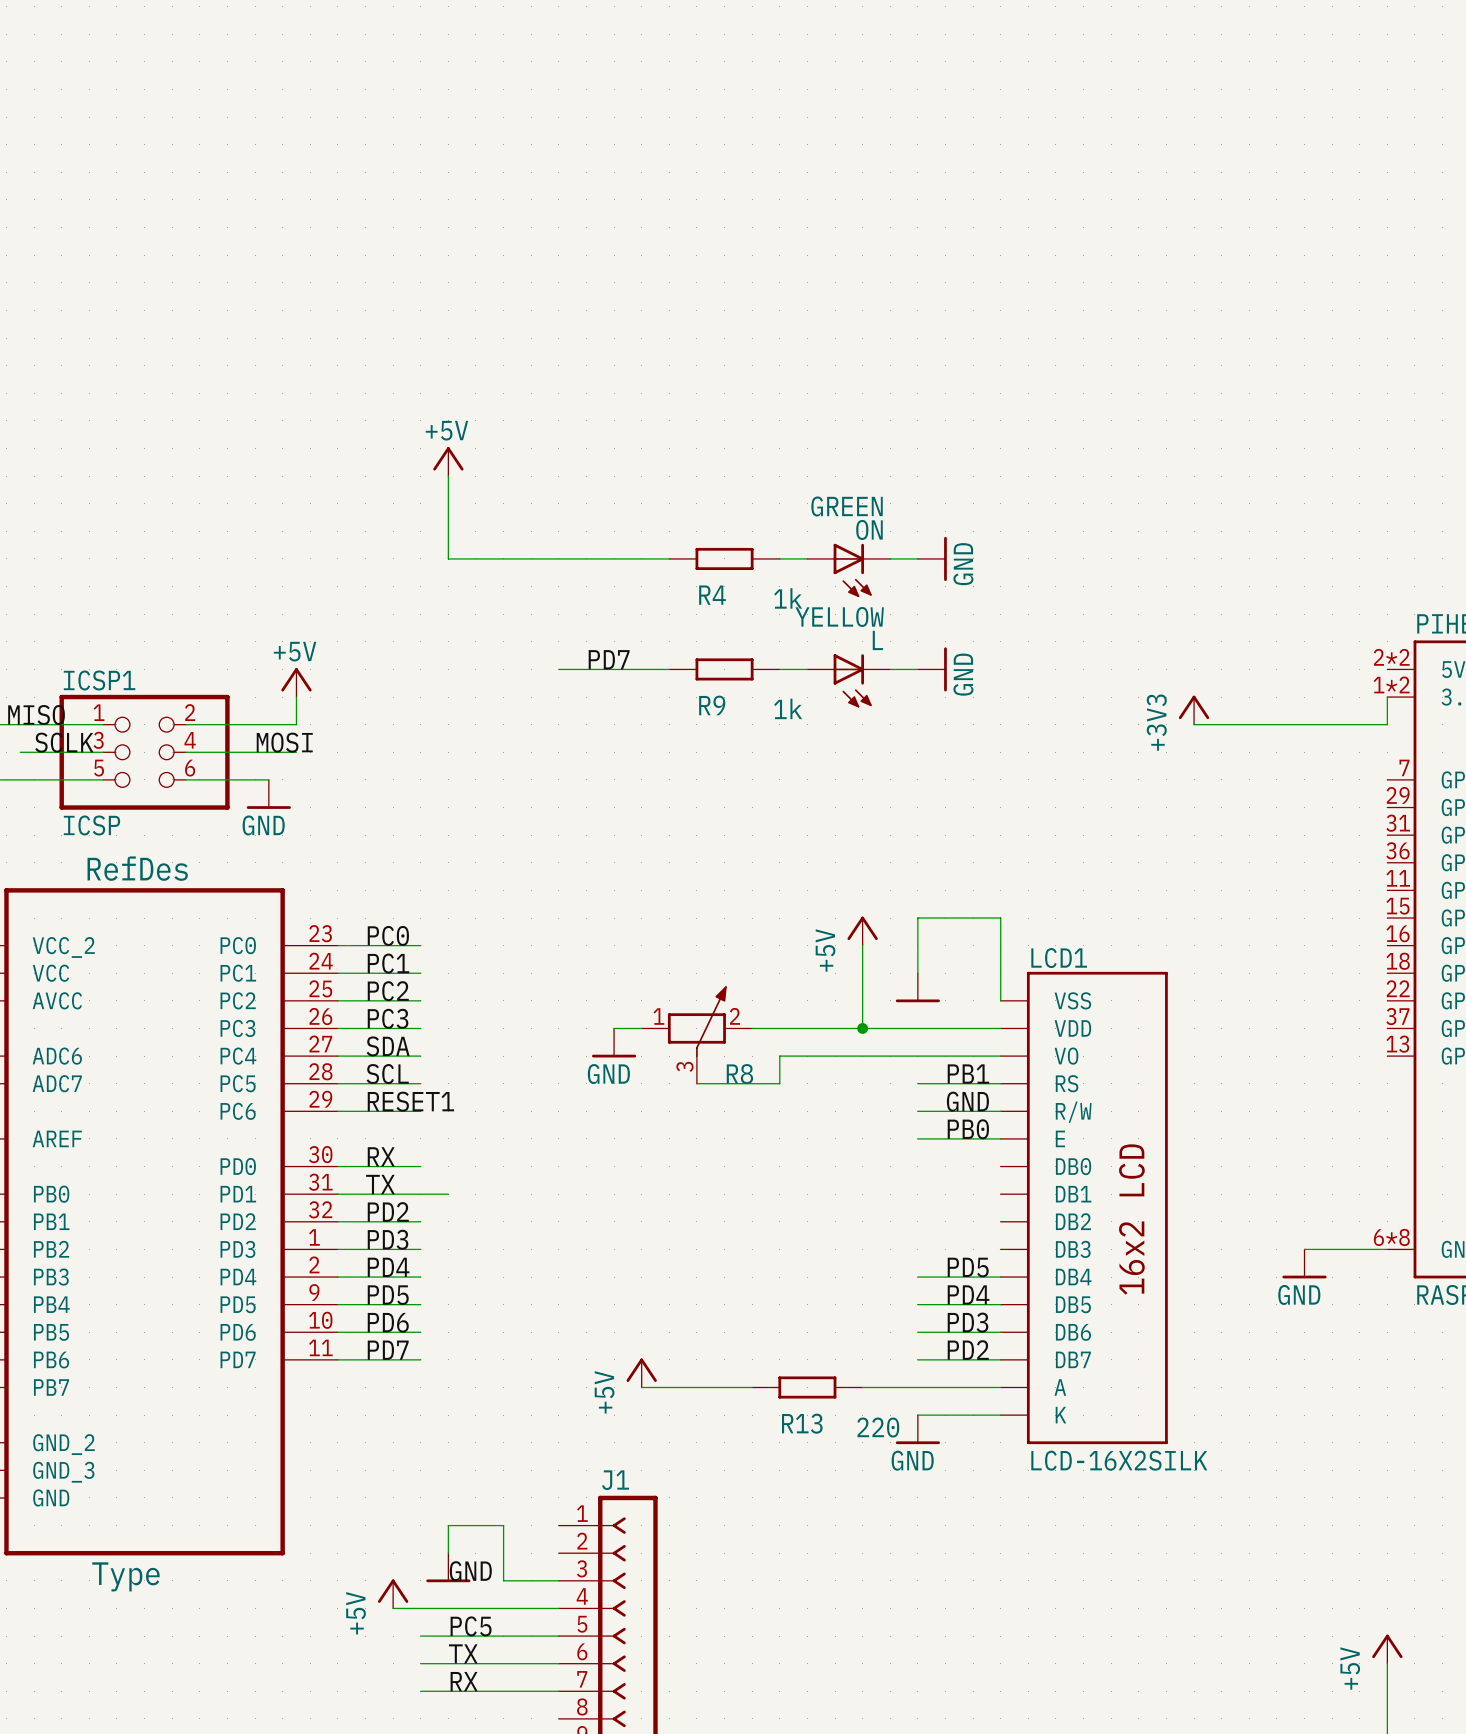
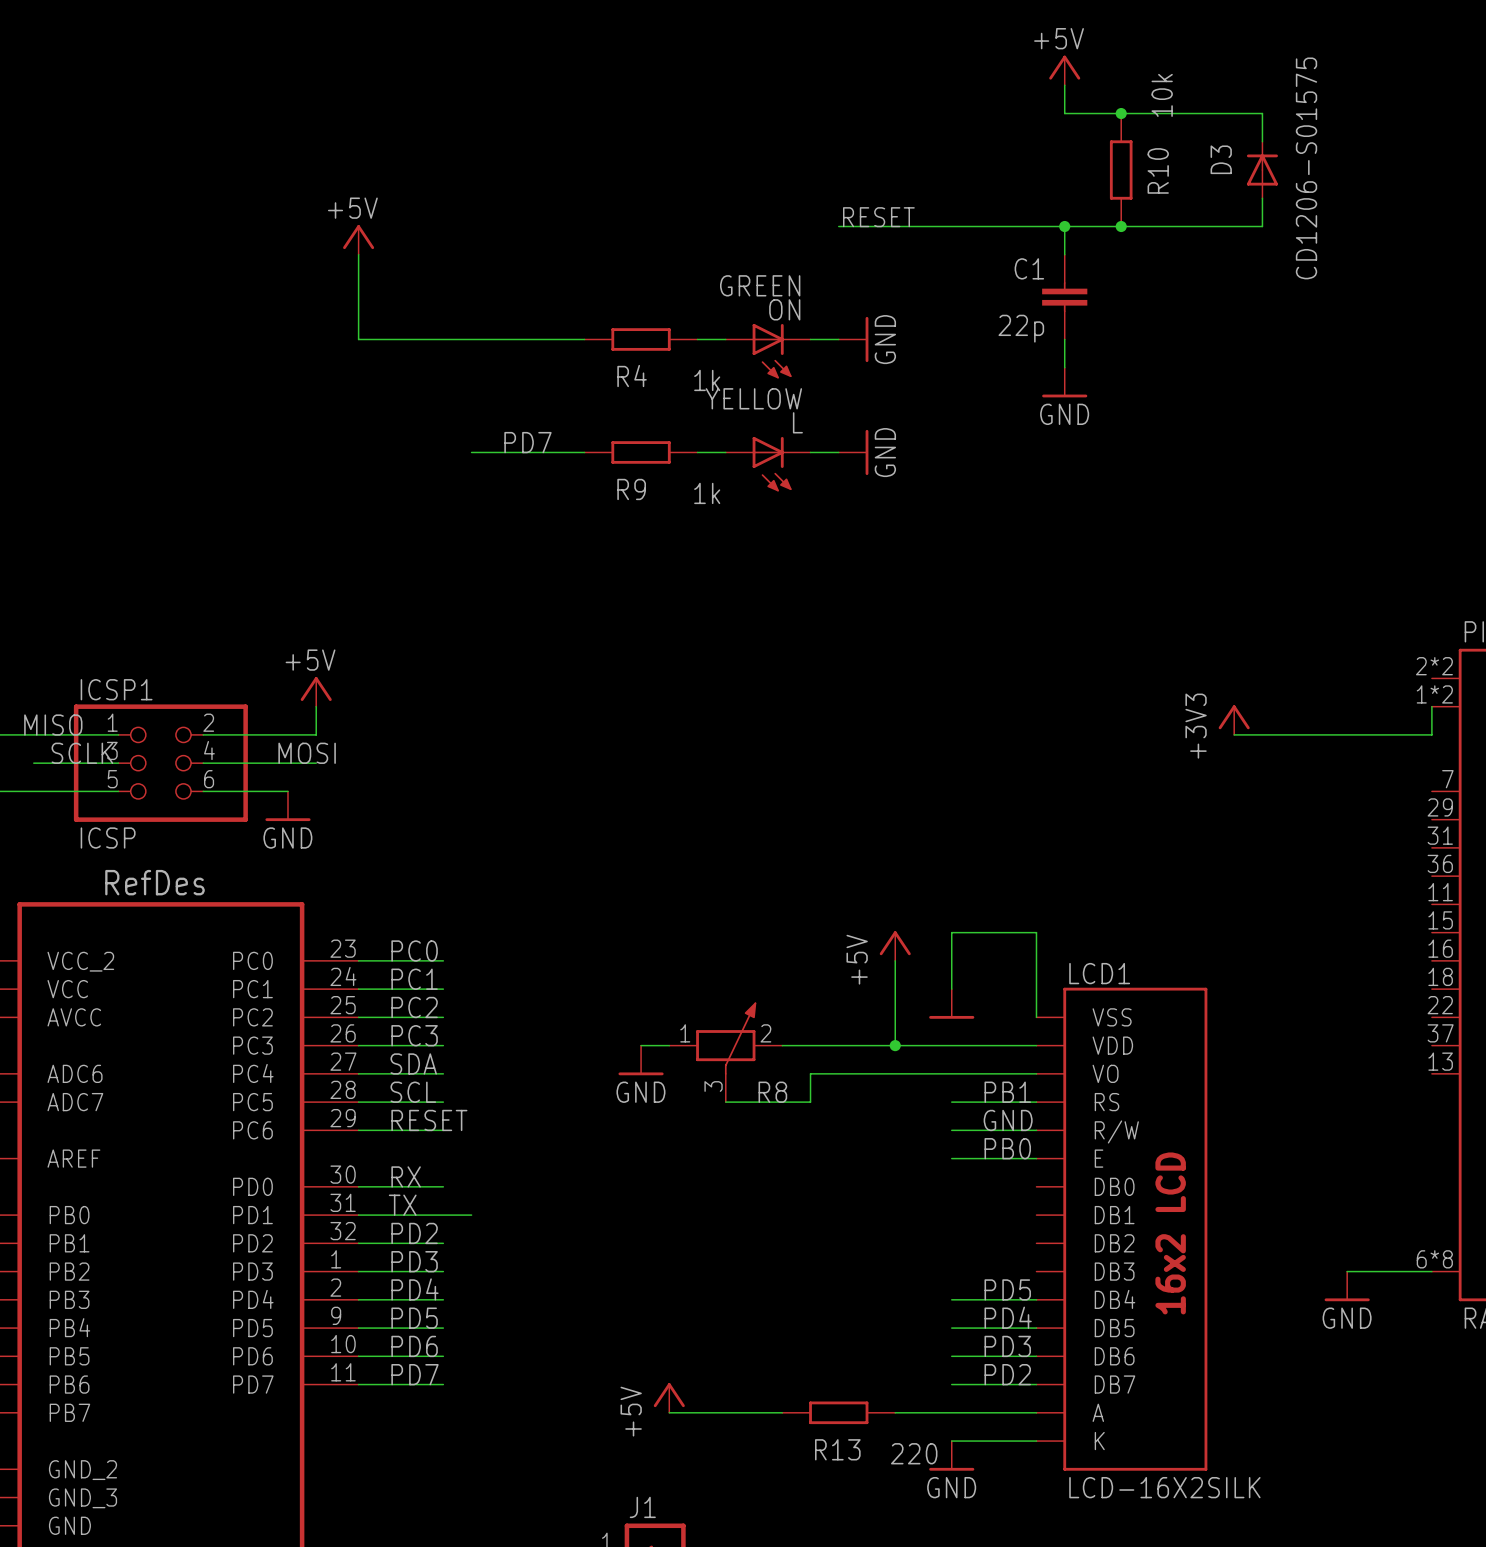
power symbol: none -> +5V (1064, 70)
wire: none -> (1064, 85) (1064, 113) (1262, 113) (1262, 141)
junction: none -> (1121, 113)
R10: none -> 10k (1121, 170)
D3: none -> CD1206-S01575 (1262, 170)
wire: none -> (1262, 198) (1262, 226) (838, 226)
label: none -> RESET (878, 217)
wire: none -> (1064, 226) (1064, 254)
junction: none -> (1064, 226)
junction: none -> (1121, 226)
C1: none -> 22p (1064, 297)
power symbol: none -> GND (853, 339)
wire: none -> (1064, 339) (1064, 367)
power symbol: none -> GND (1064, 382)
power symbol: none -> GND (853, 452)
power symbol position: +5V (448, 461) -> +5V (358, 239)
wire: (448, 476) (448, 558) (669, 558) -> (358, 254) (358, 339) (584, 339)
R4 position: (724, 558) -> (641, 339)
wire: (779, 558) (807, 558) -> (697, 339) (725, 339)
wire: (890, 558) (917, 558) -> (810, 339) (838, 339)
power symbol: GND (932, 558) -> none
ON position: (848, 570) -> (768, 351)
label position: PD7 (609, 659) -> PD7 (527, 442)
wire: (558, 669) (669, 669) -> (471, 452) (584, 452)
R9 position: (724, 669) -> (641, 452)
wire: (779, 669) (807, 669) -> (697, 452) (725, 452)
wire: (890, 669) (917, 669) -> (810, 452) (838, 452)
power symbol: GND (932, 669) -> none
L position: (848, 680) -> (768, 464)
label: RESET1 (410, 1101) -> RESET (429, 1120)

